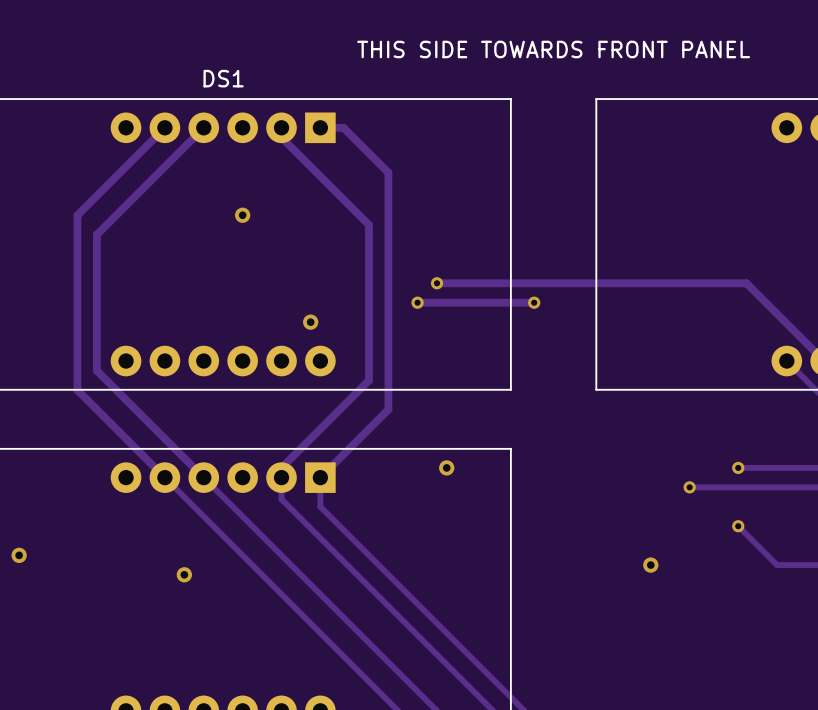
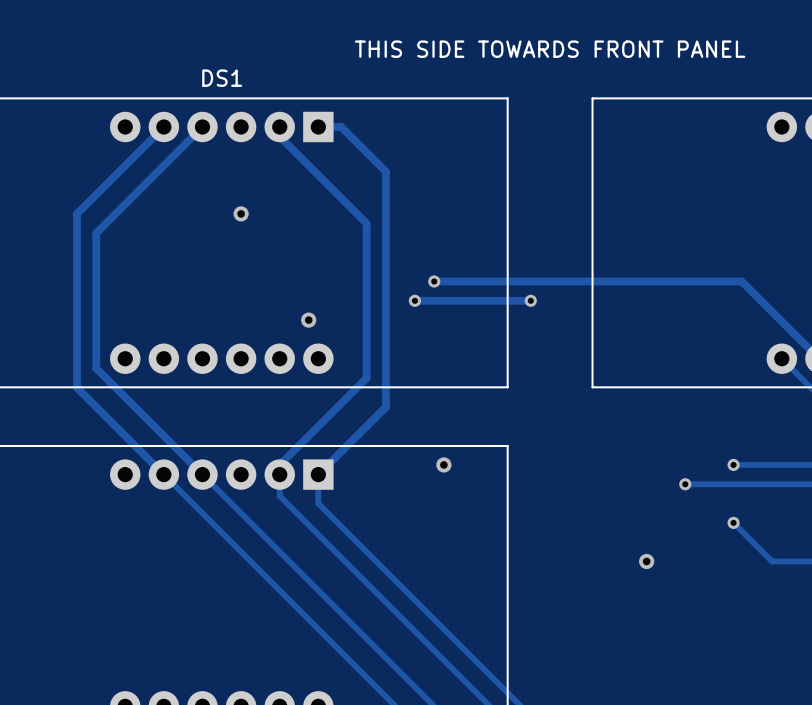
via: (19, 555) -> none
via: (184, 574) -> none

